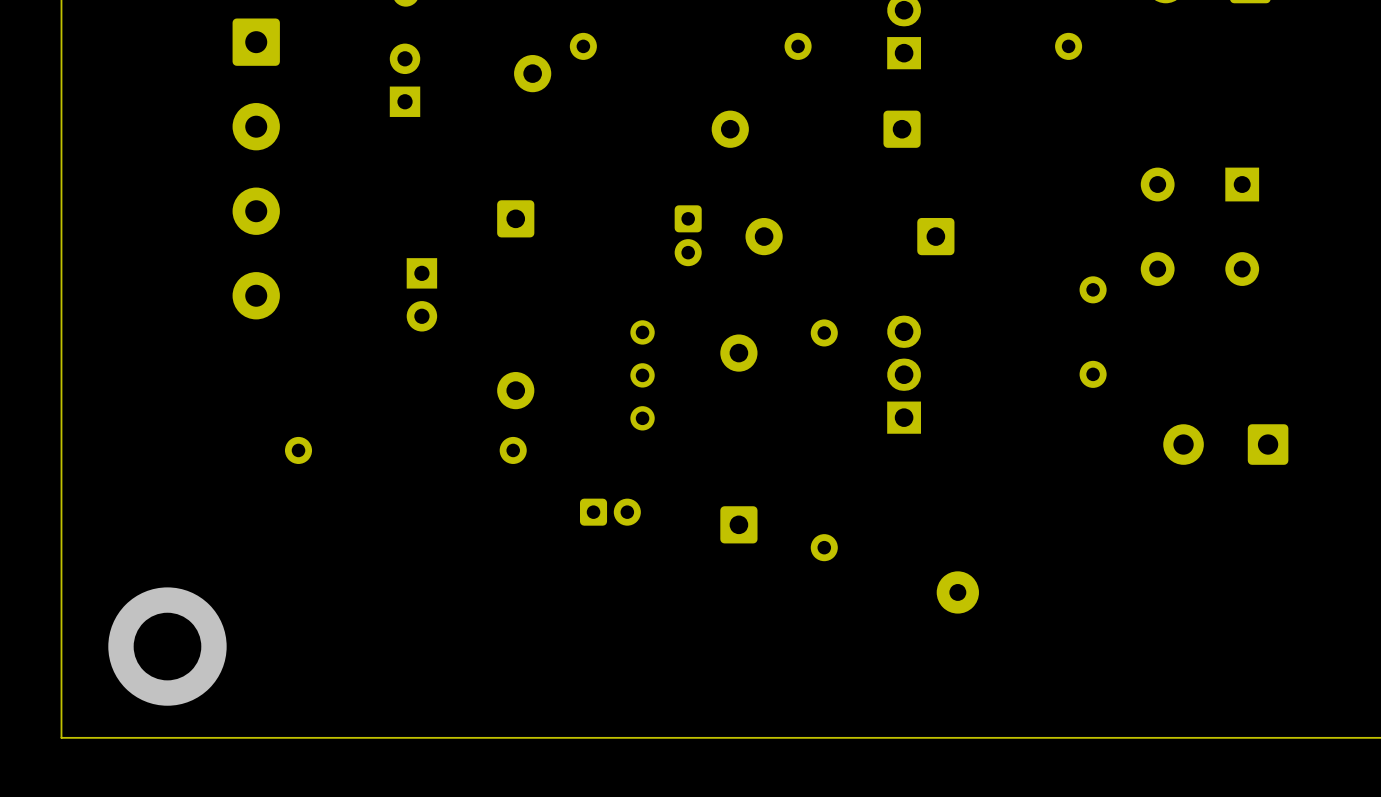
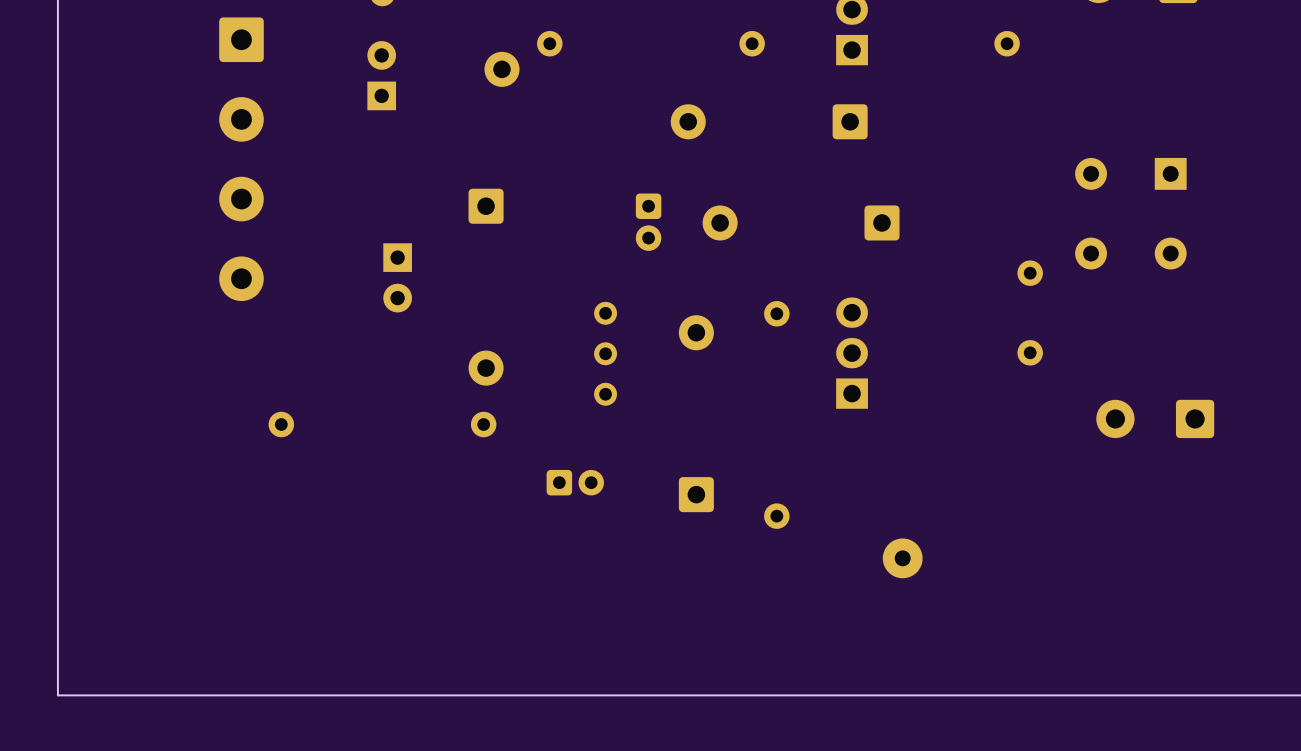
via: (167, 646) -> none

